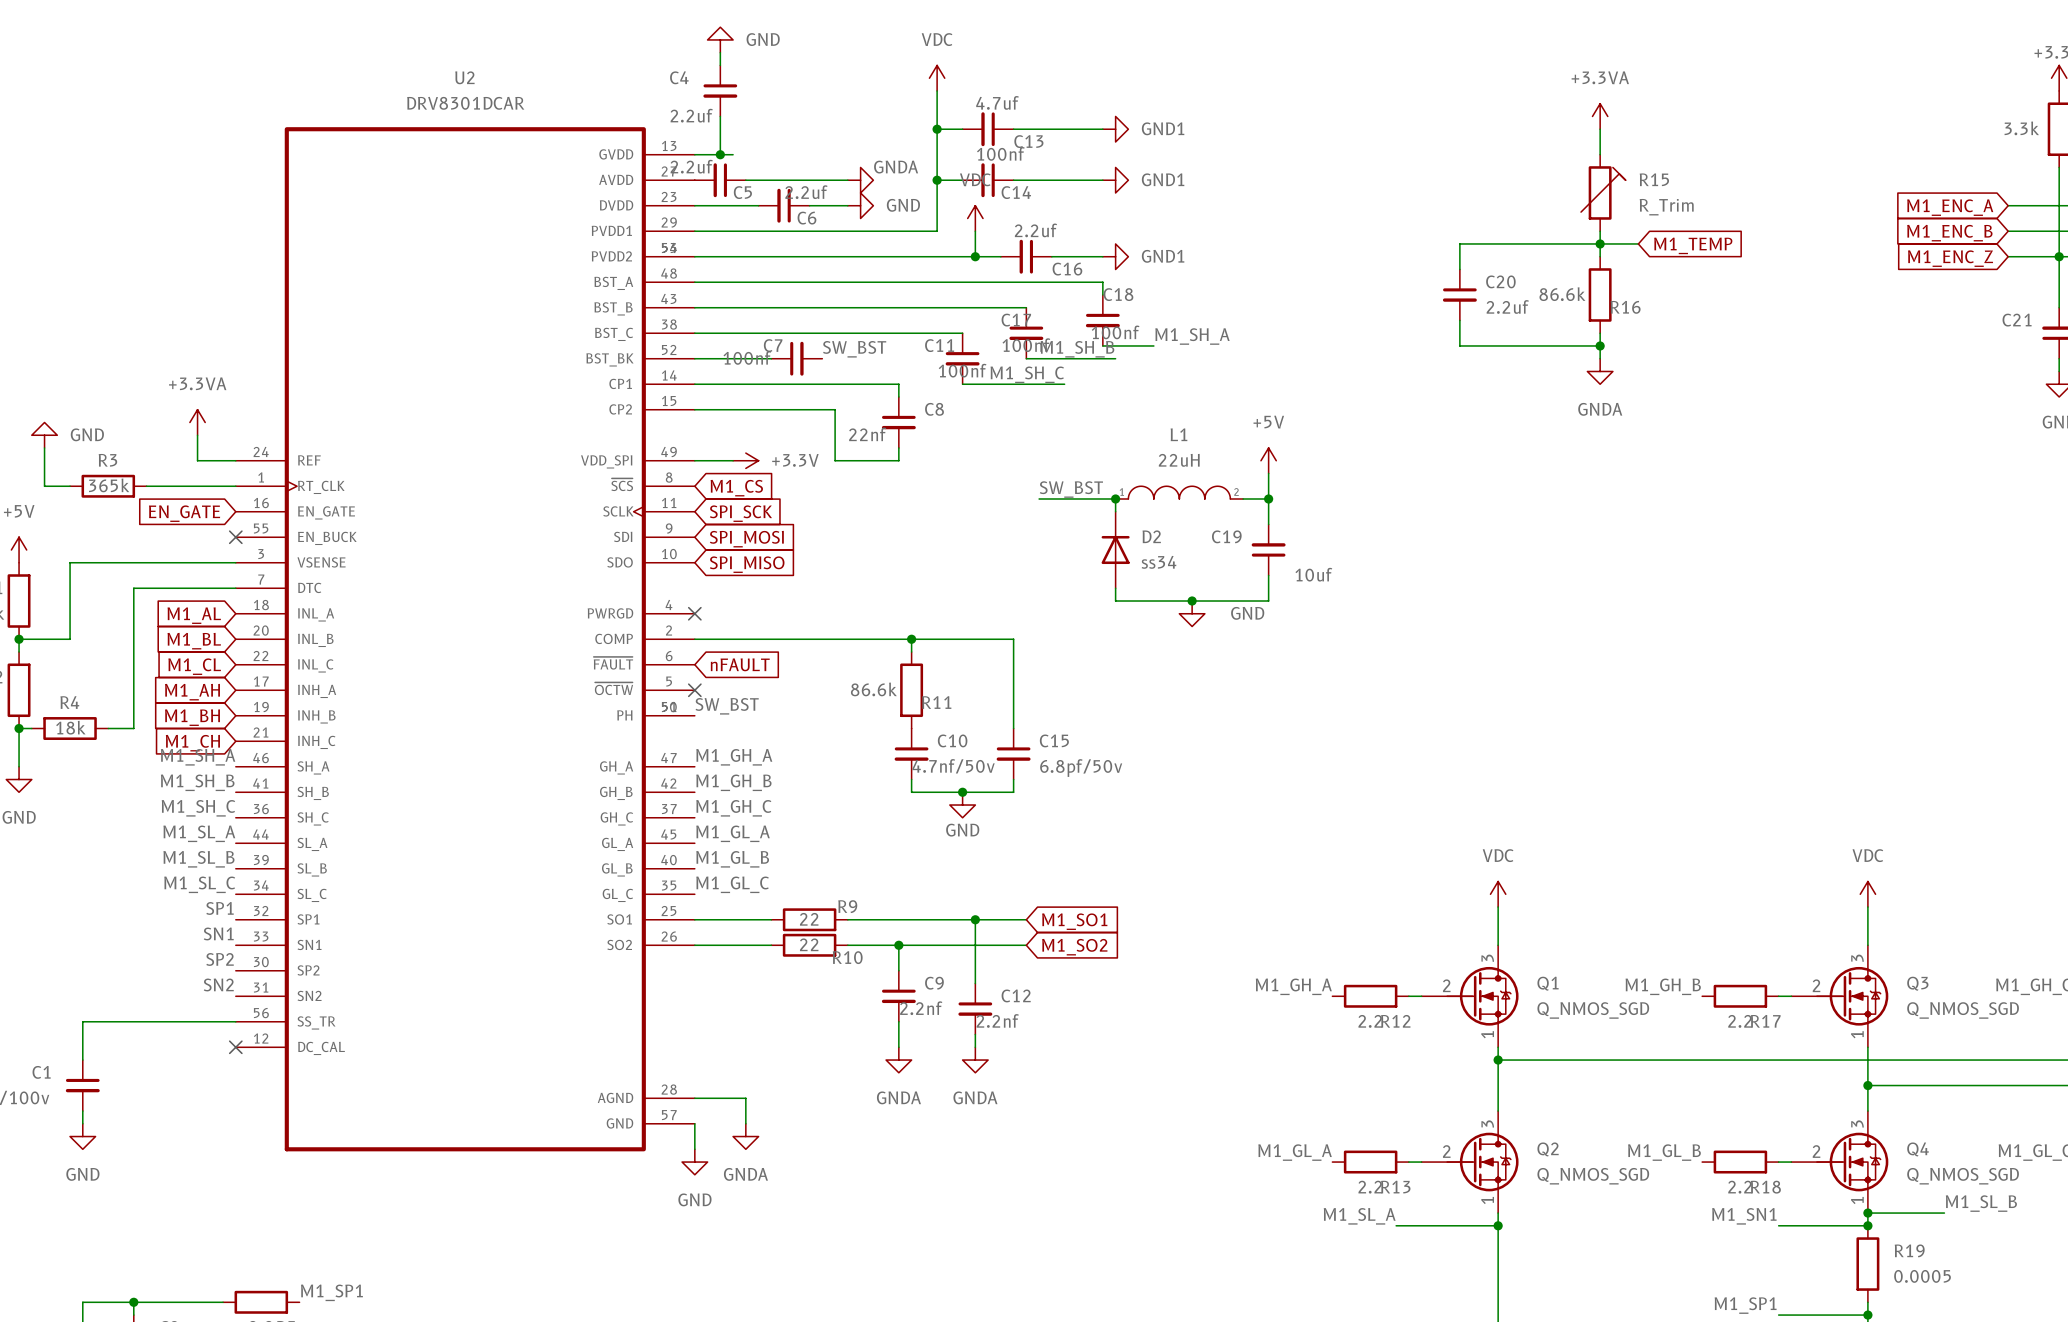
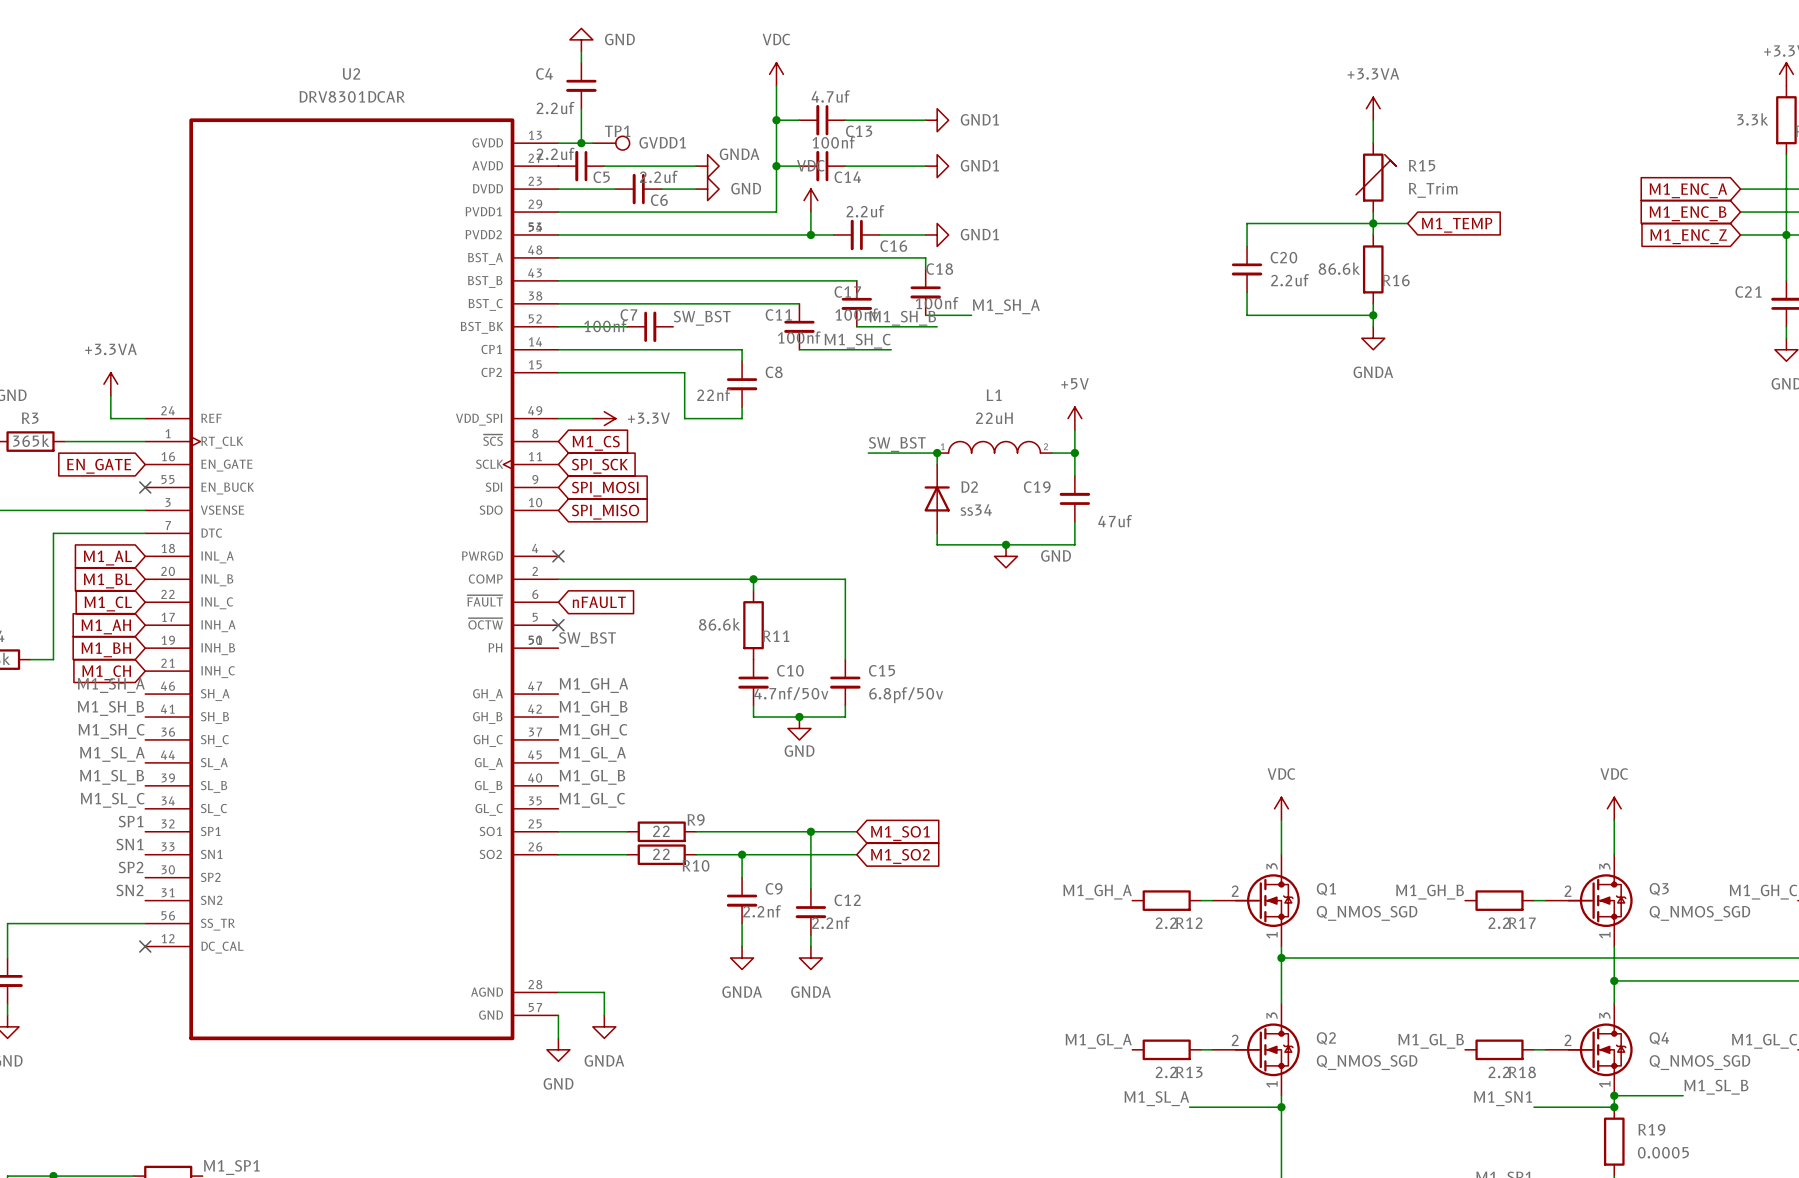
TP1: none -> GVDD1 (611, 143)
C19 value: 10uf (1313, 574) -> 47uf (1115, 521)

